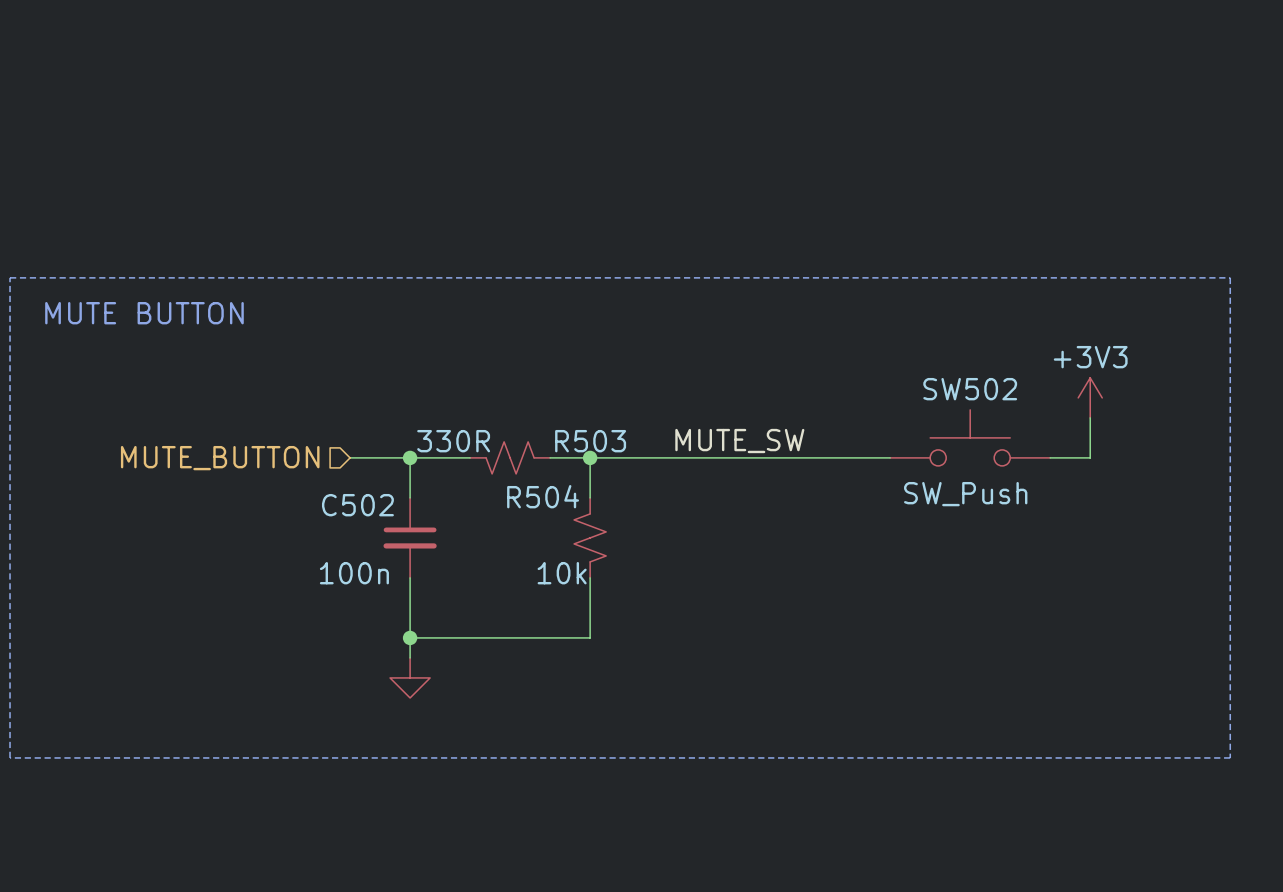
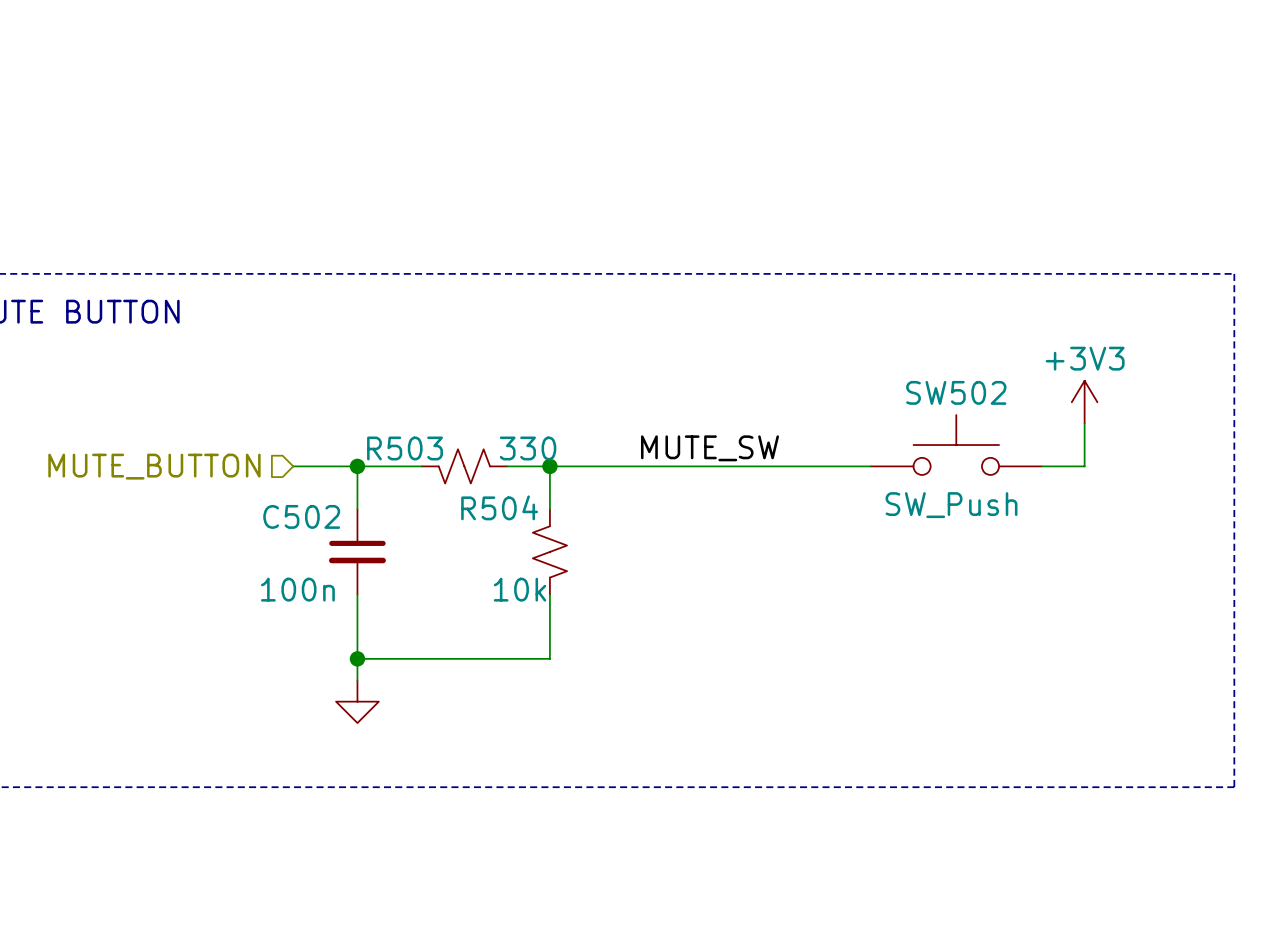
R503 value: 330R (453, 441) -> 330 (528, 448)
R503 name position: R503 (590, 441) -> R503 (405, 448)

